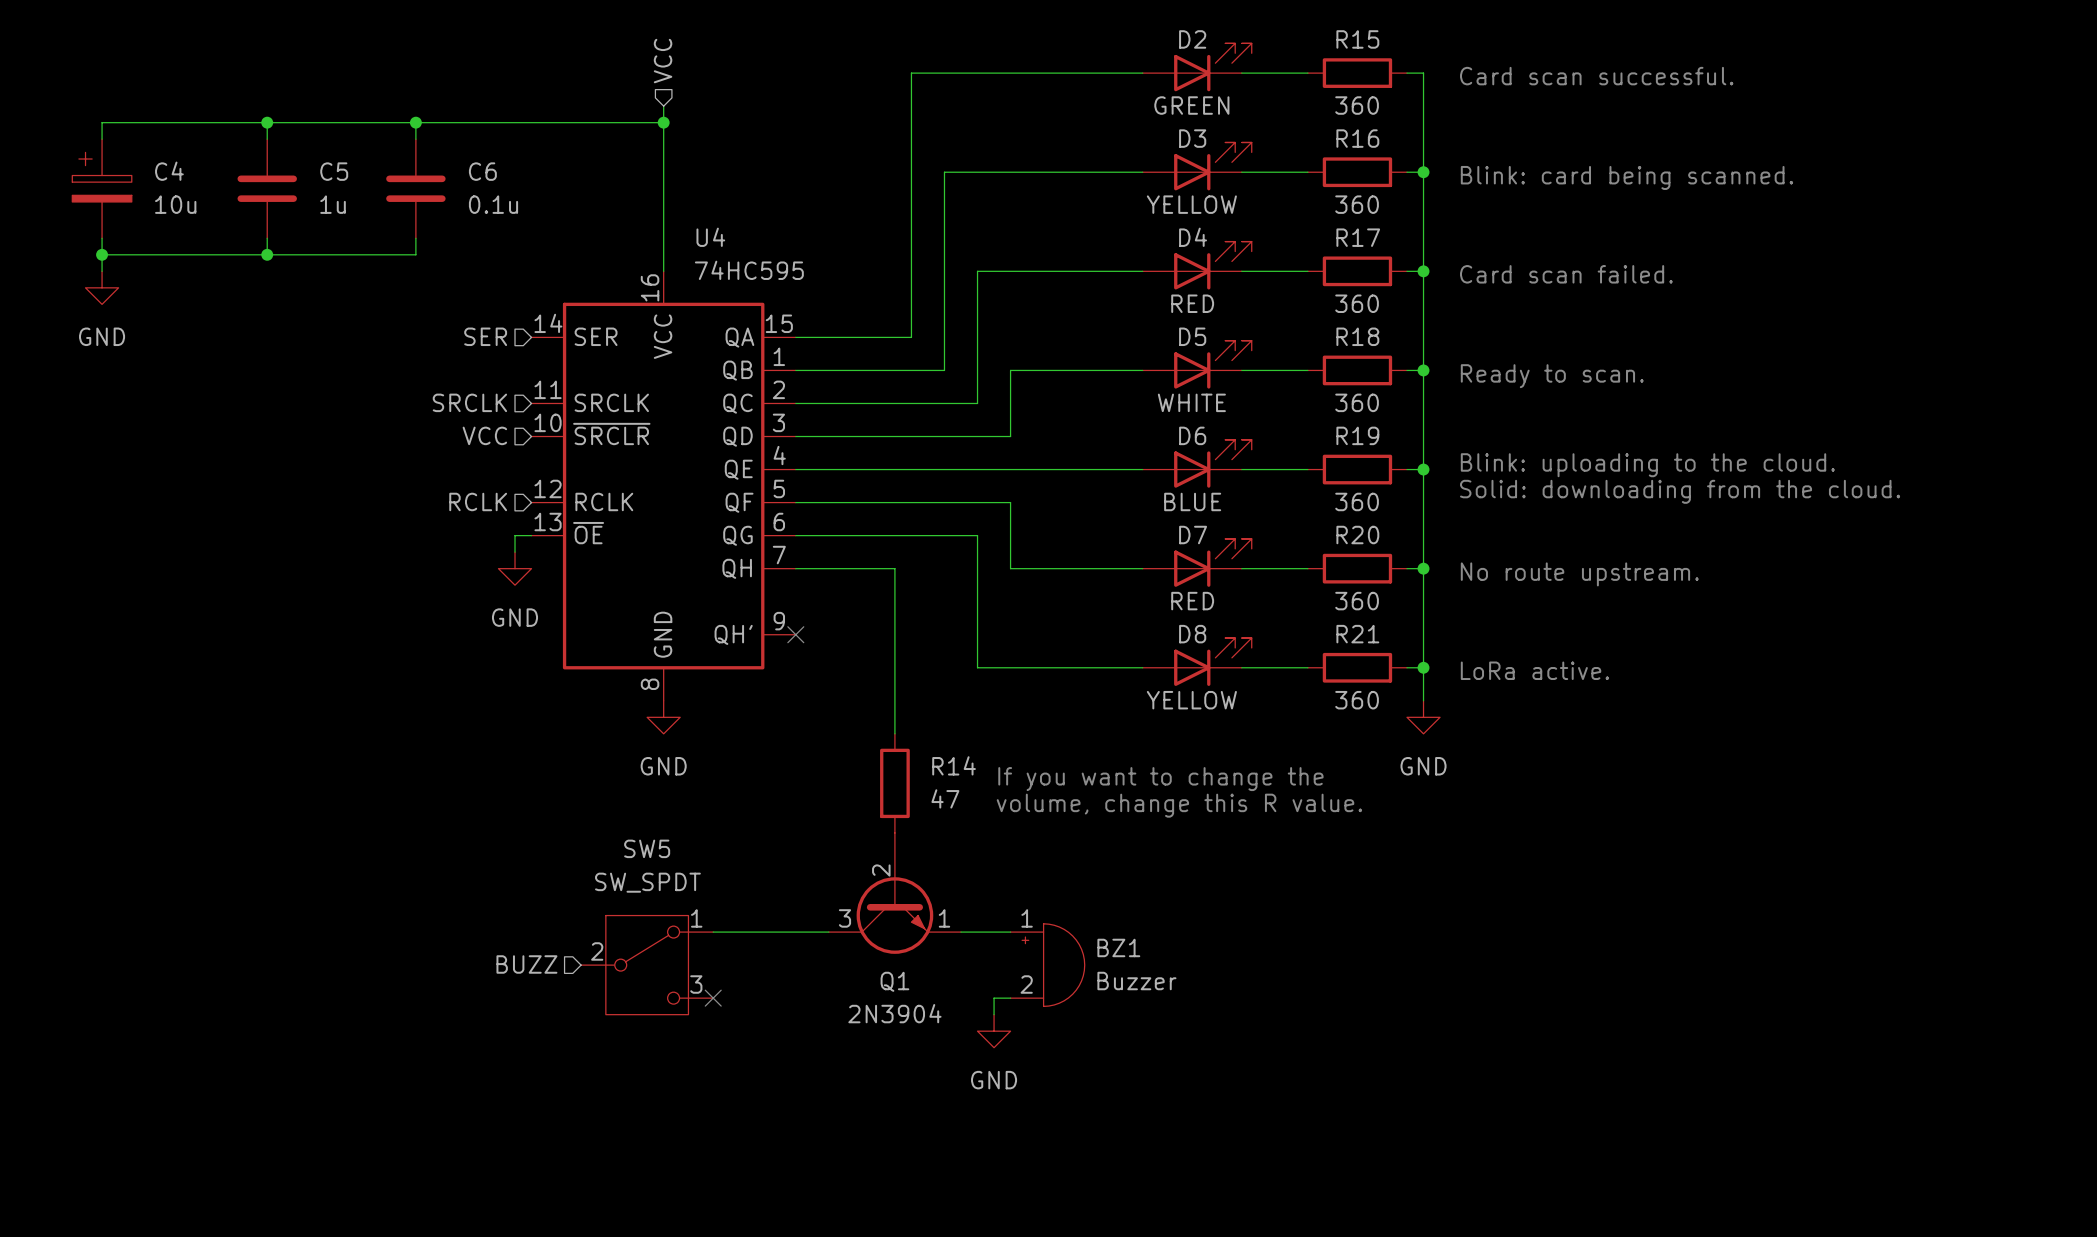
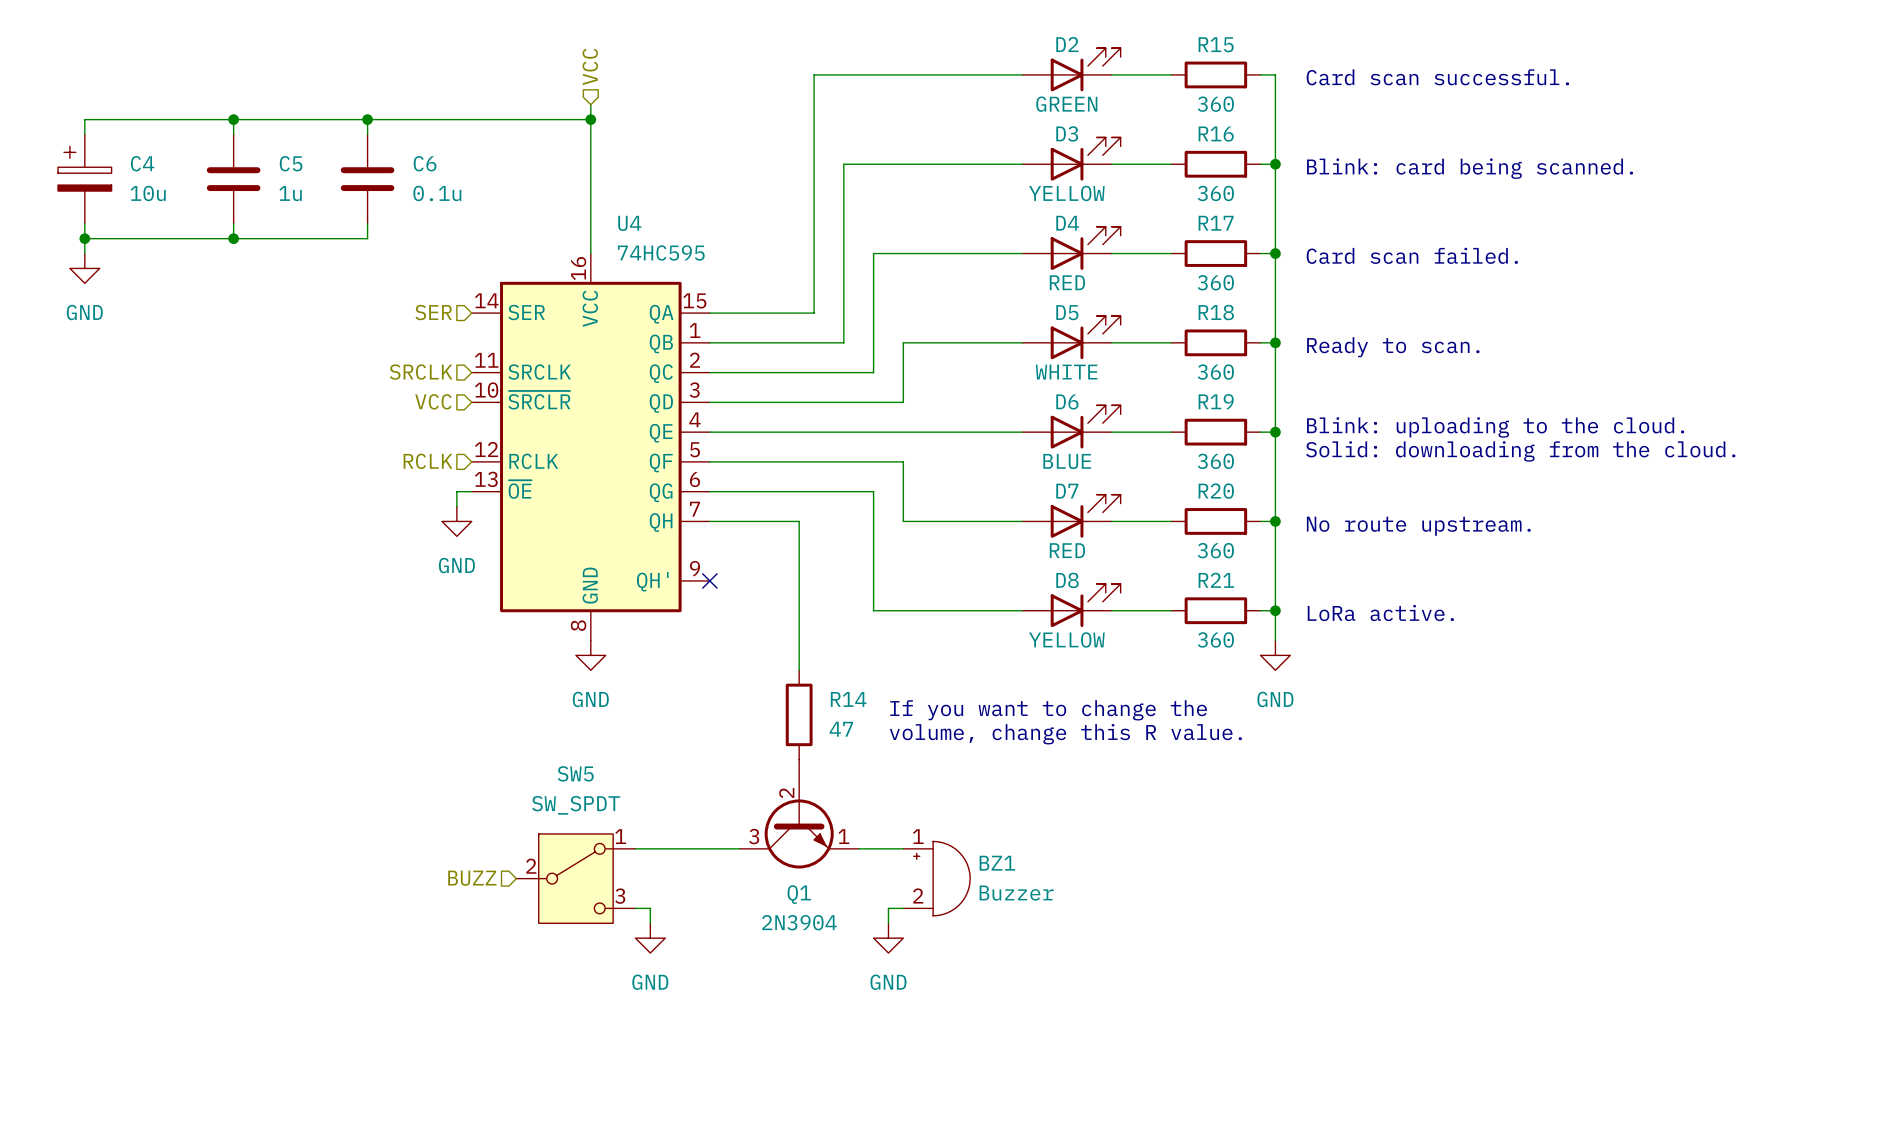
wire: none -> (635, 908) (650, 908) (650, 923)
no-connect mark: (713, 998) -> none
power symbol: none -> GND (650, 938)

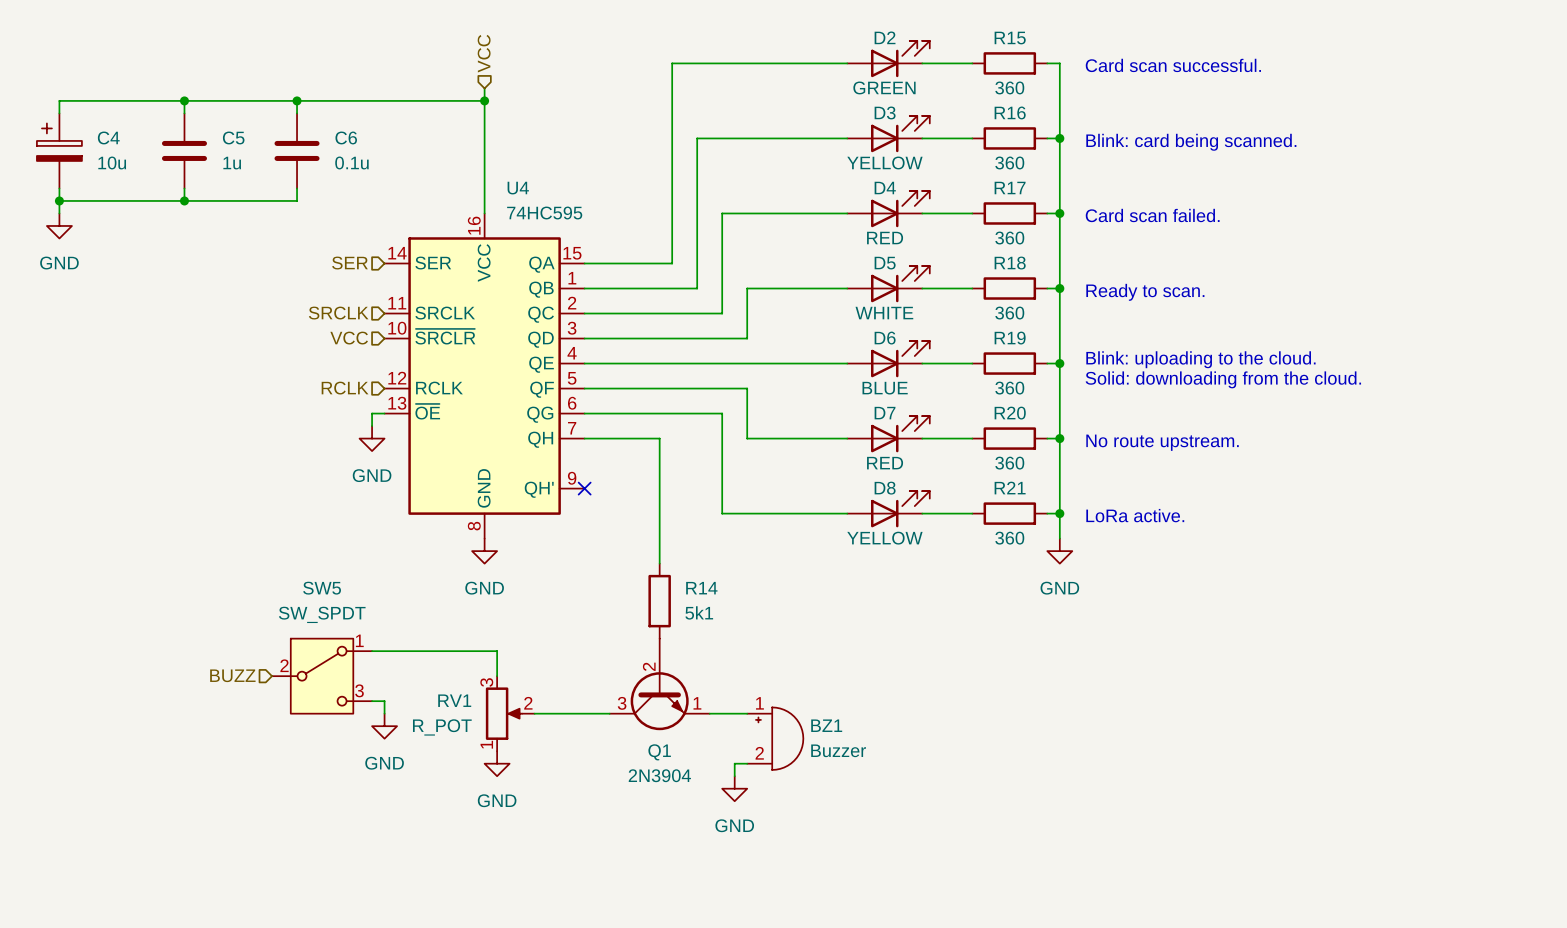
text: If you want to change the (1048, 710) -> none
R14 value: 47 (841, 729) -> 5k1 (699, 612)
text: volume, change this R value. (1065, 734) -> none
wire: none -> (372, 651) (497, 651) (497, 676)
RV1: none -> R_POT (510, 713)
power symbol: none -> GND (384, 726)
hierarchical label position: BUZZ (472, 878) -> BUZZ (232, 675)
SW5 position: (575, 878) -> (322, 676)
wire: (635, 908) (650, 908) (650, 923) -> (372, 701) (384, 701) (384, 713)
power symbol position: GND (650, 938) -> GND (497, 763)

